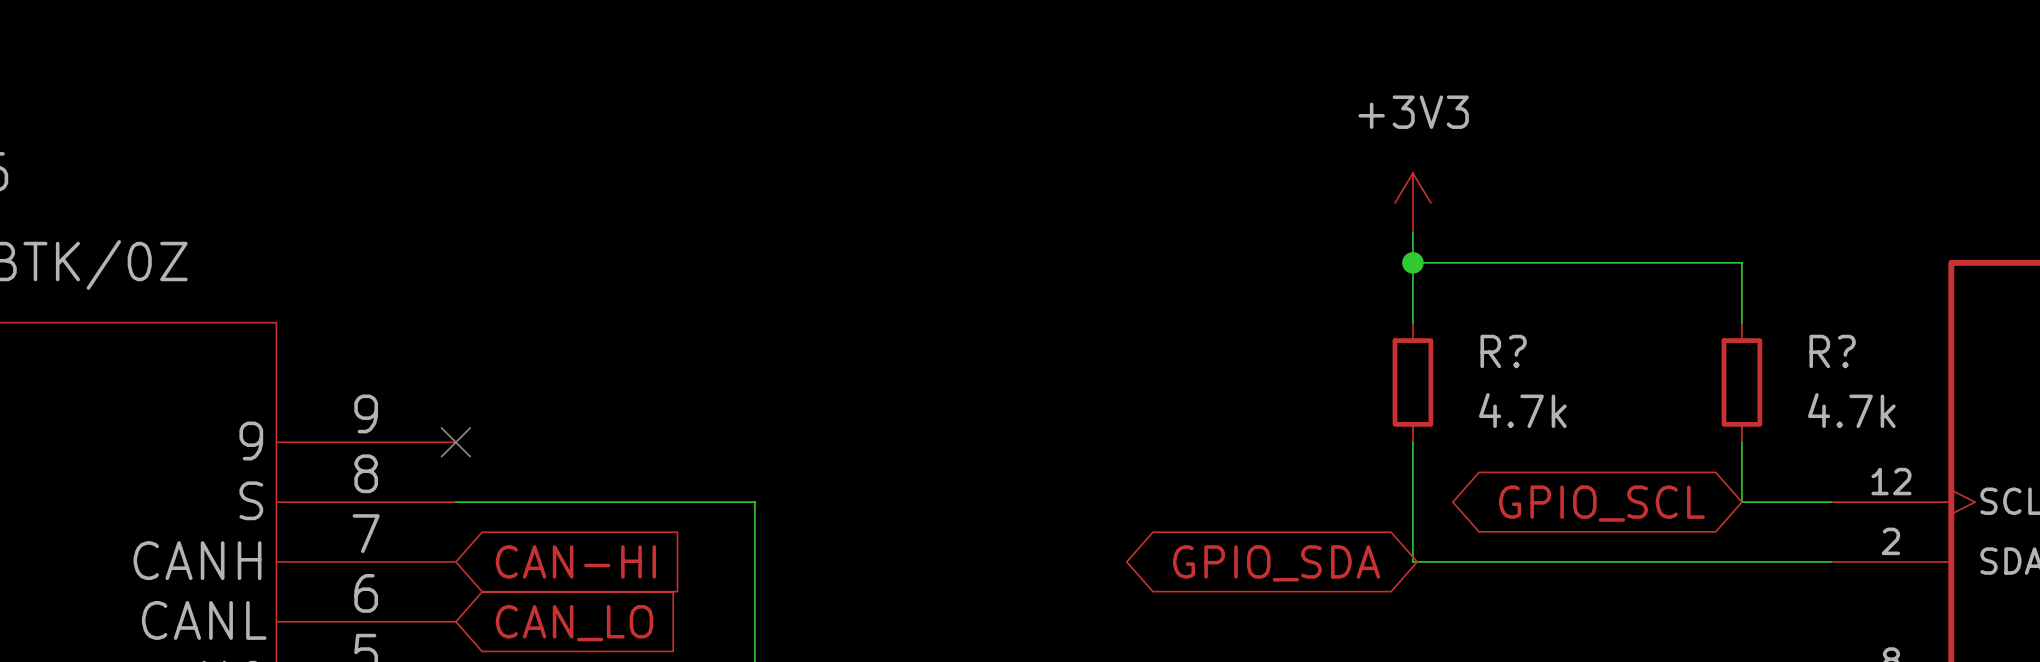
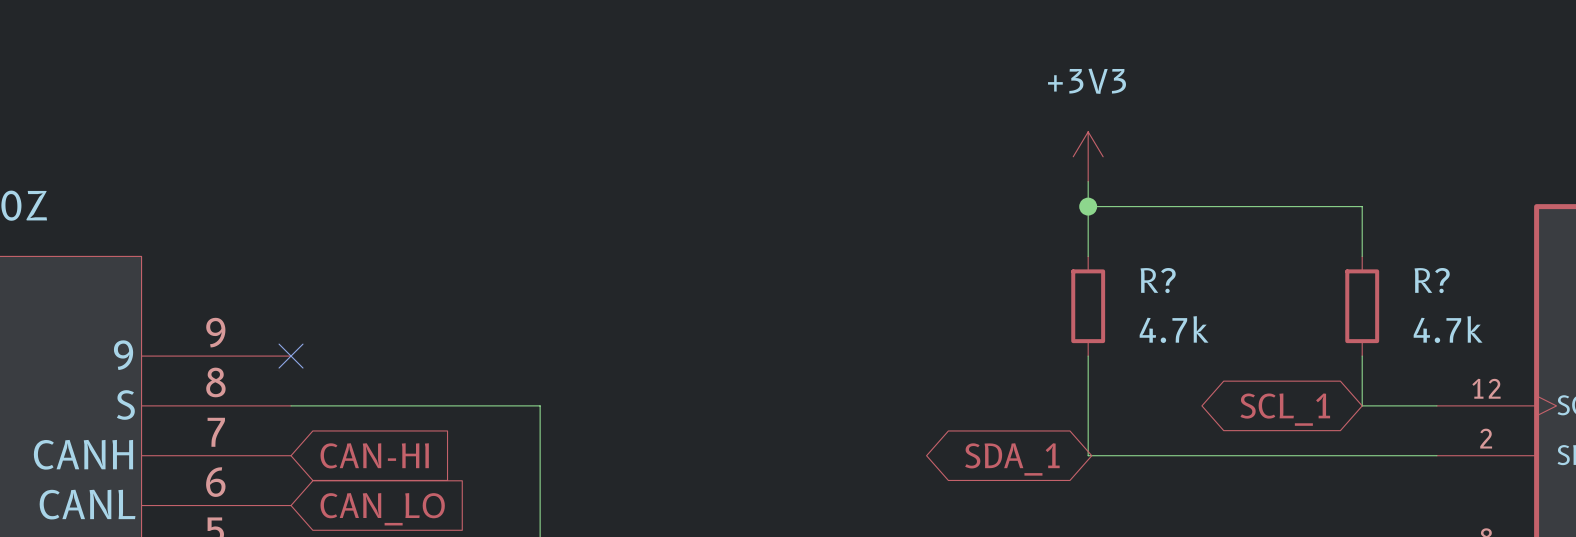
global label: GPIO_SCL (1601, 503) -> SCL_1 (1285, 409)
global label: GPIO_SDA (1276, 563) -> SDA_1 (1012, 459)

